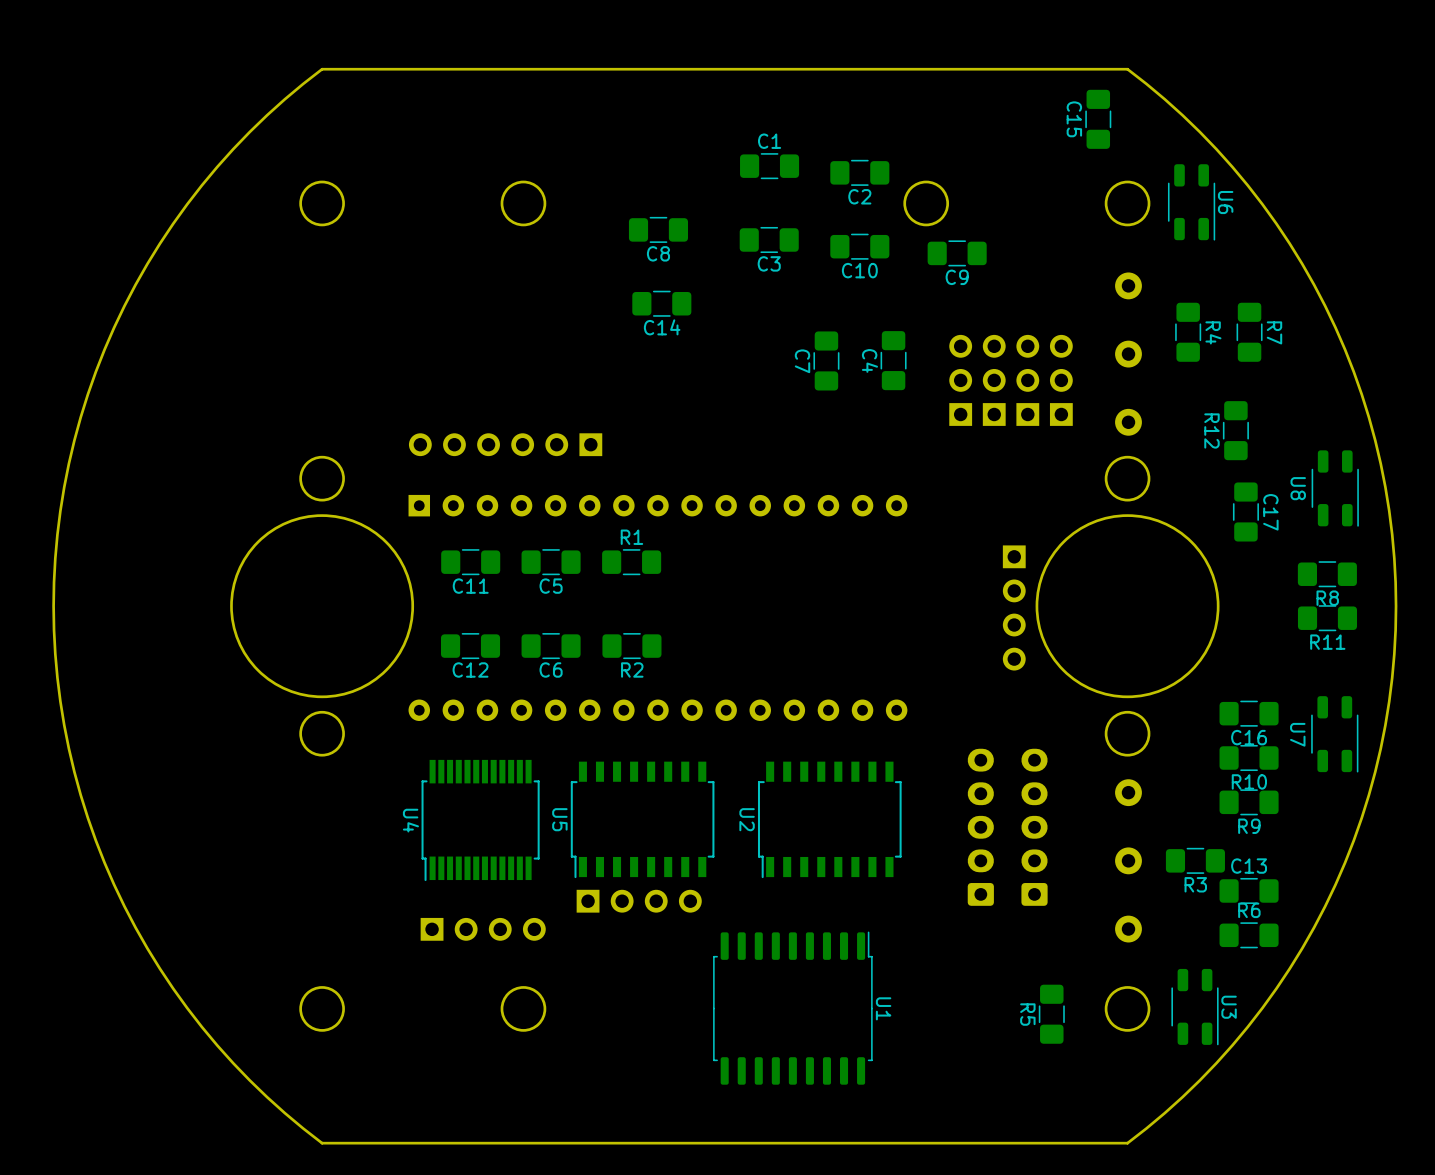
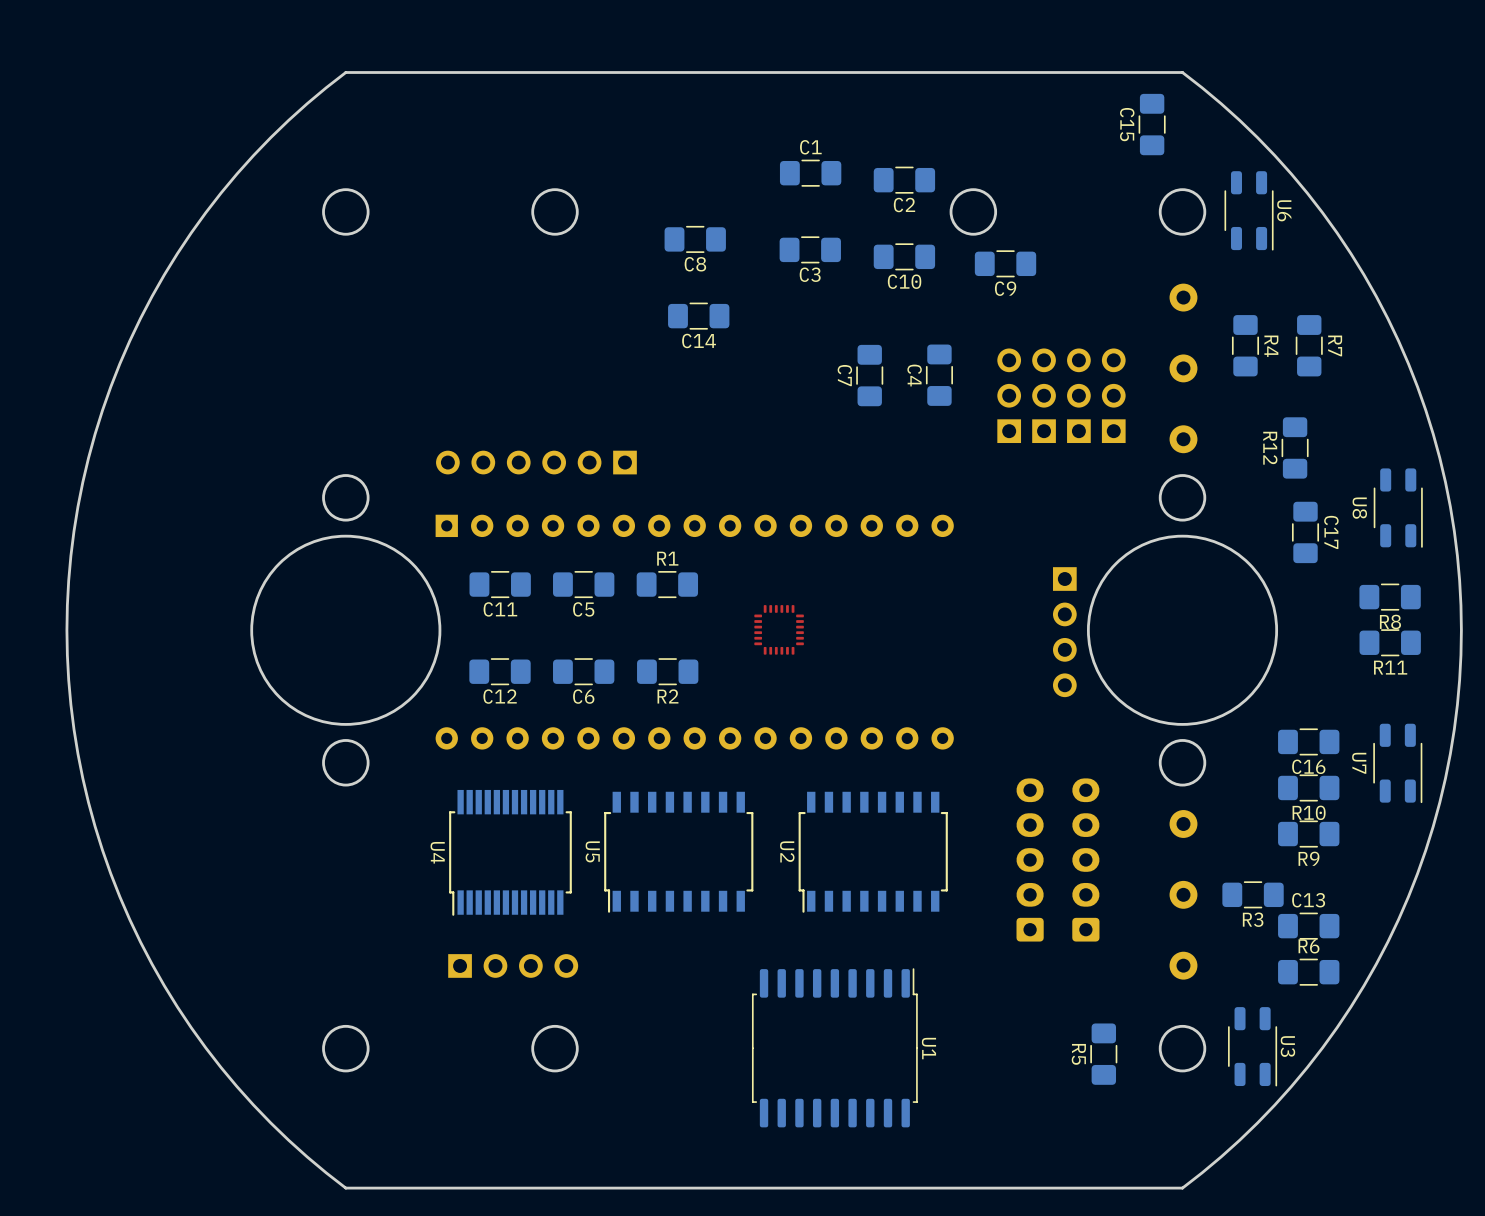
part: none -> (779, 629)
part: (639, 901) -> none

